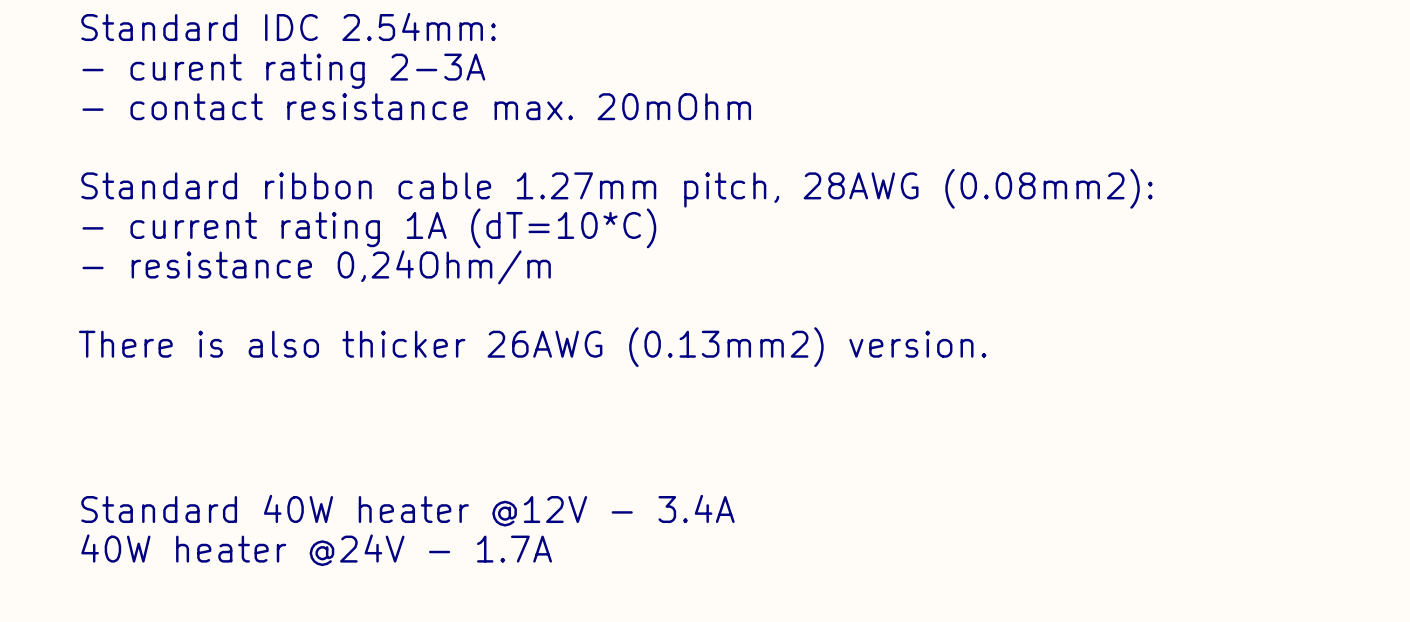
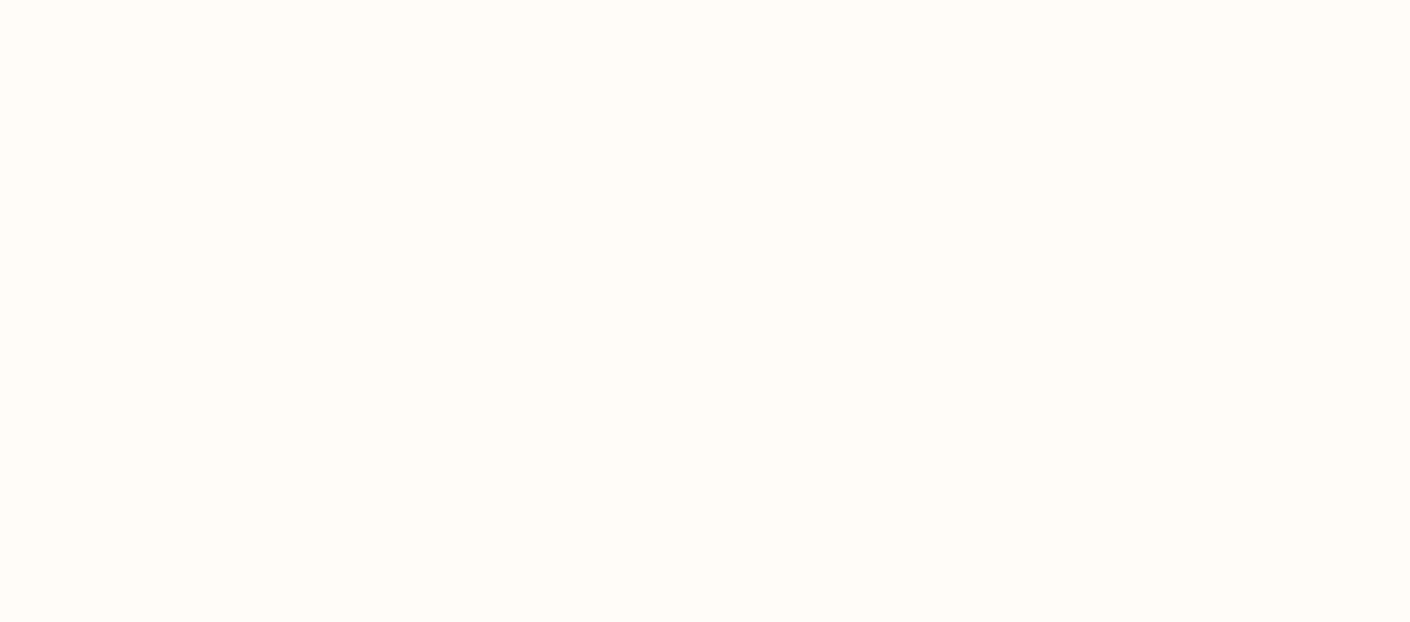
text: Standard IDC 2.54mm: (288, 26) -> none
text: - curent rating 2-3A (283, 71) -> none
text: - contact resistance max. 20mOhm (416, 106) -> none
text: Standard ribbon cable 1.27mm pitch, 28AWG (0.08mm2): (616, 188) -> none
text: - current rating 1A (dT=10*C) (369, 228) -> none
text: - resistance 0,24Ohm/m (316, 267) -> none
text: There is also thicker 26AWG (0.13mm2) version. (532, 347) -> none
text: Standard 40W heater @12V - 3.4A (407, 510) -> none
text: 40W heater @24V - 1.7A (316, 550) -> none

